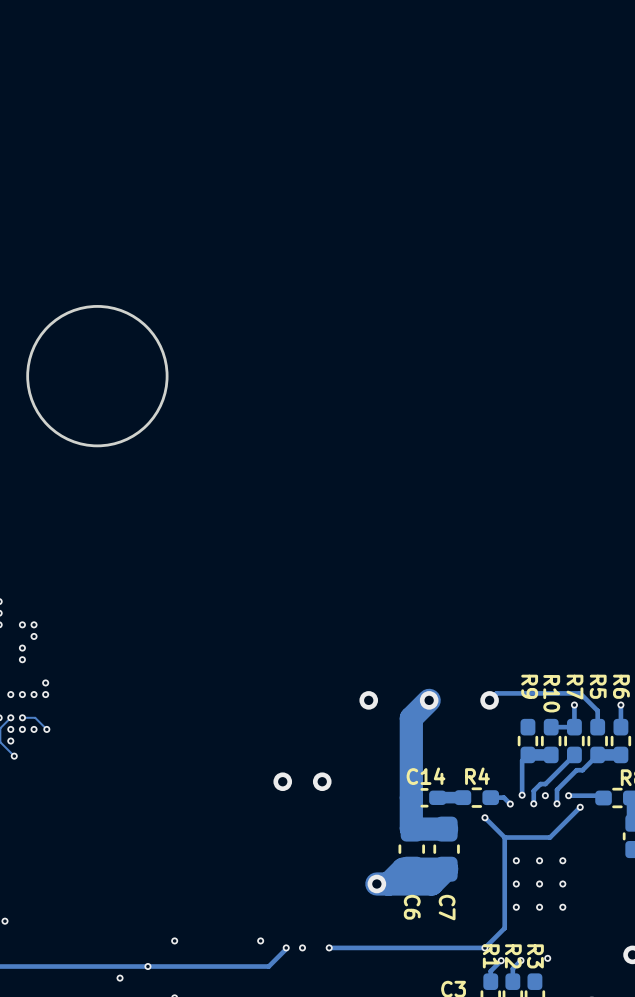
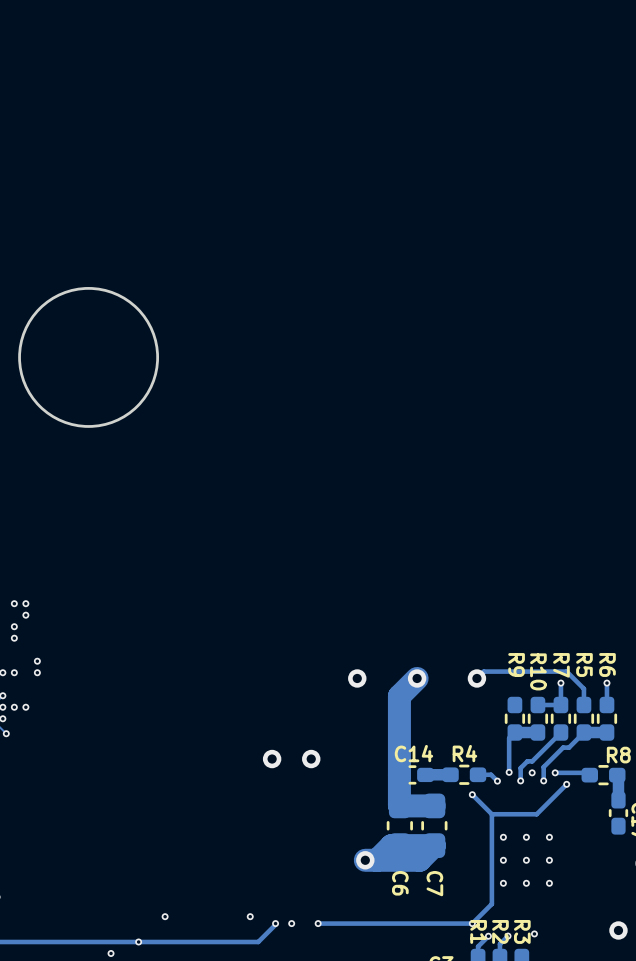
via: (34, 694) -> none
track: (22, 717) (35, 717) (46, 729) -> none
via: (22, 717) -> none
via: (46, 729) -> none

